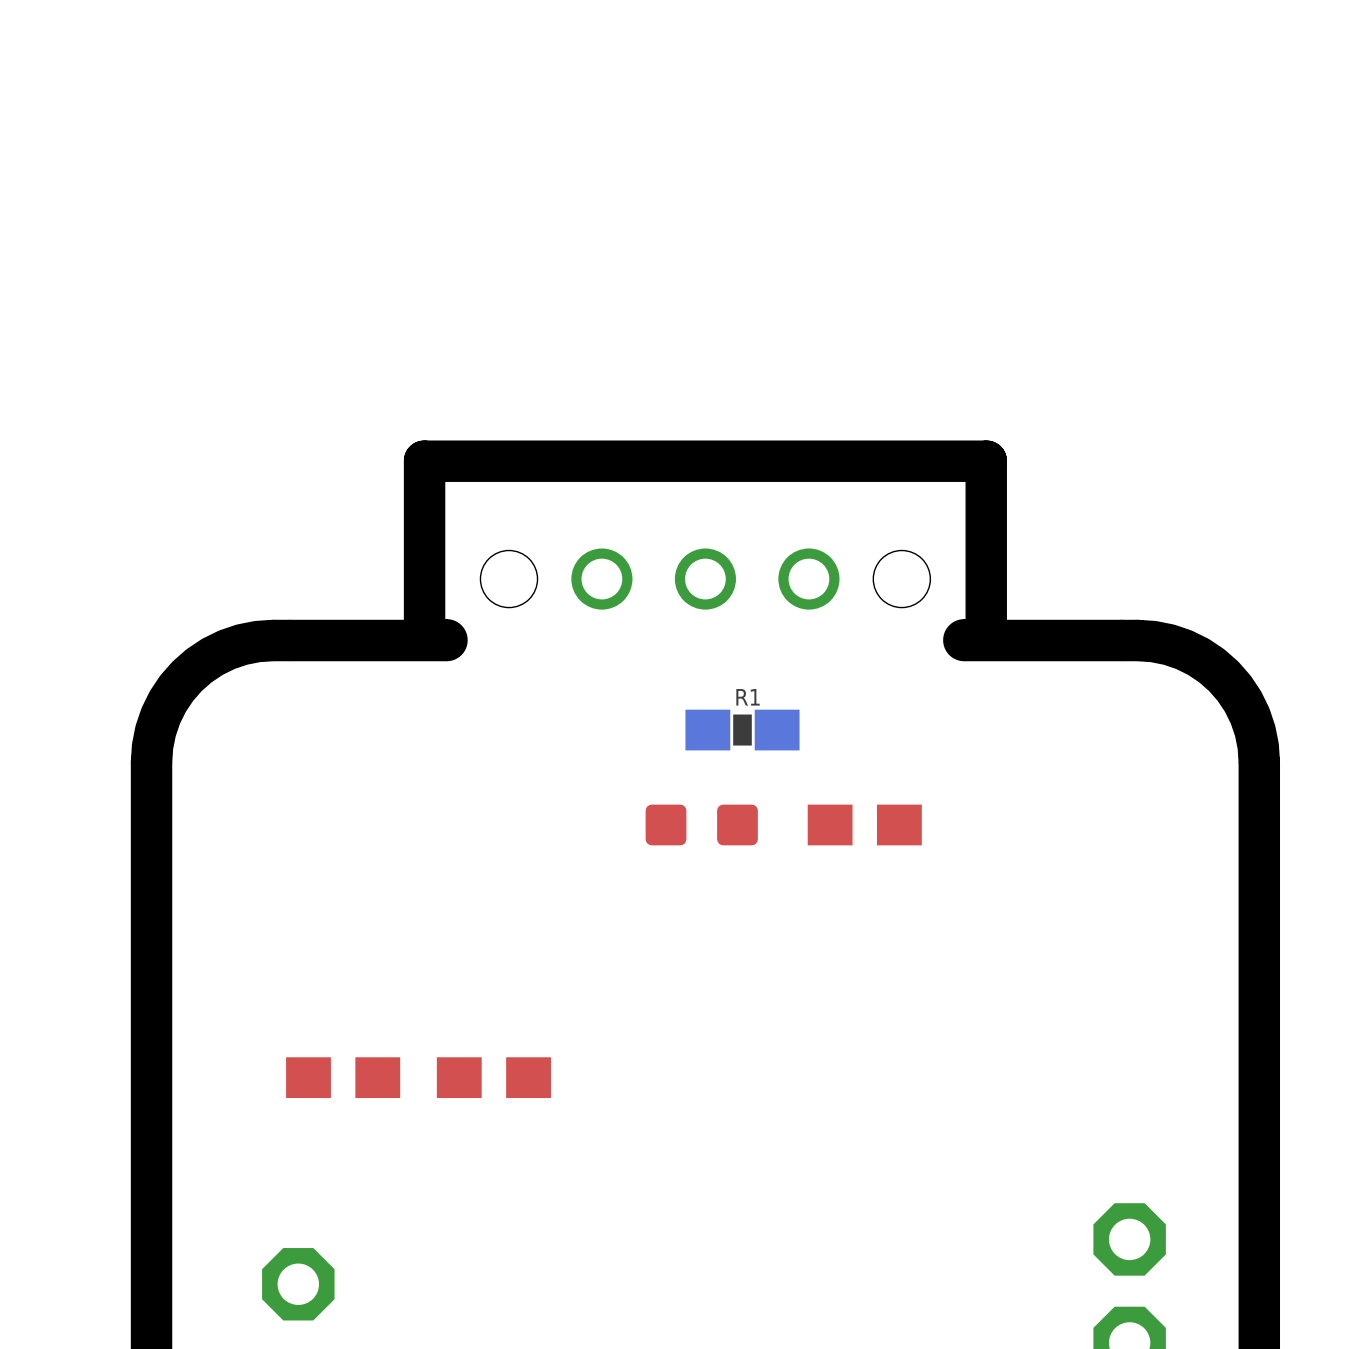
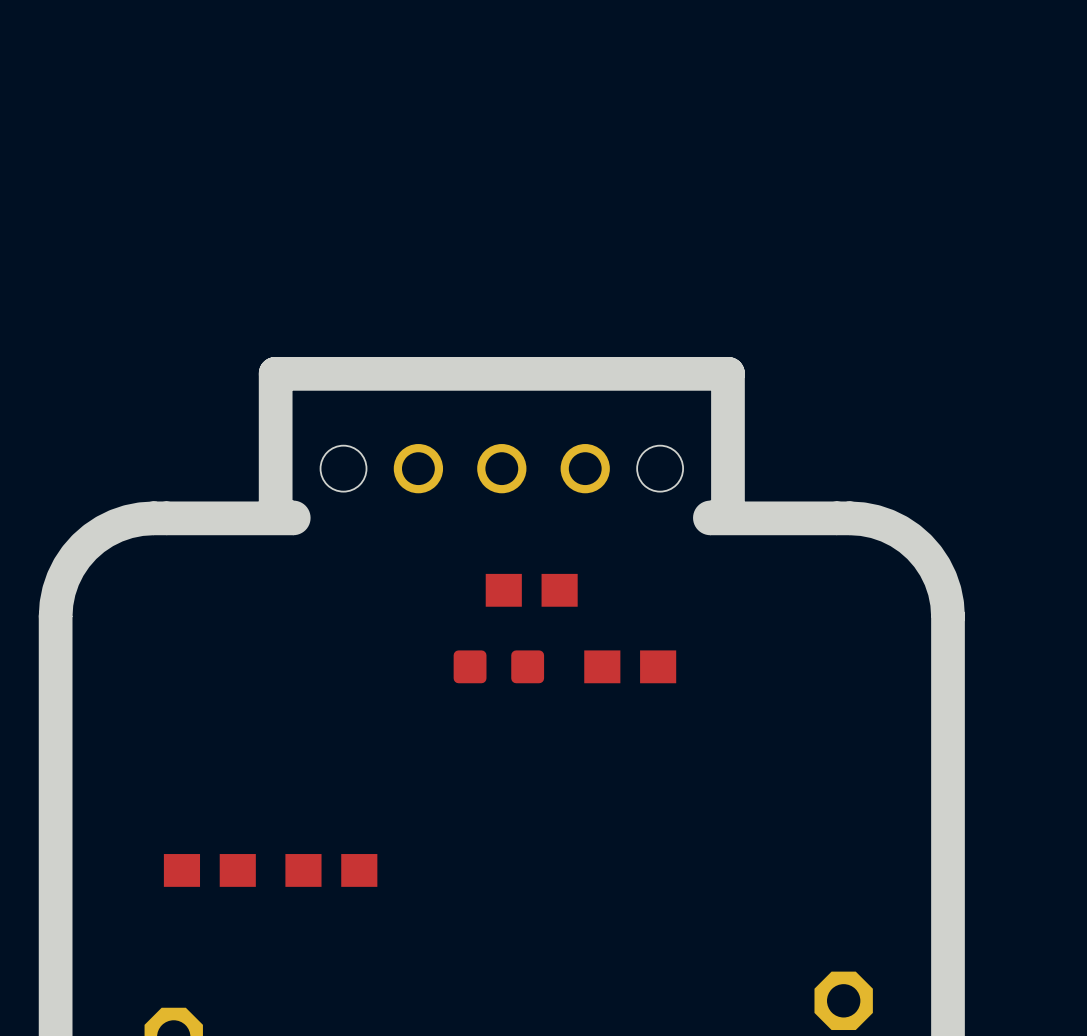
R1 side: bottom (742, 730) -> top (531, 590)

